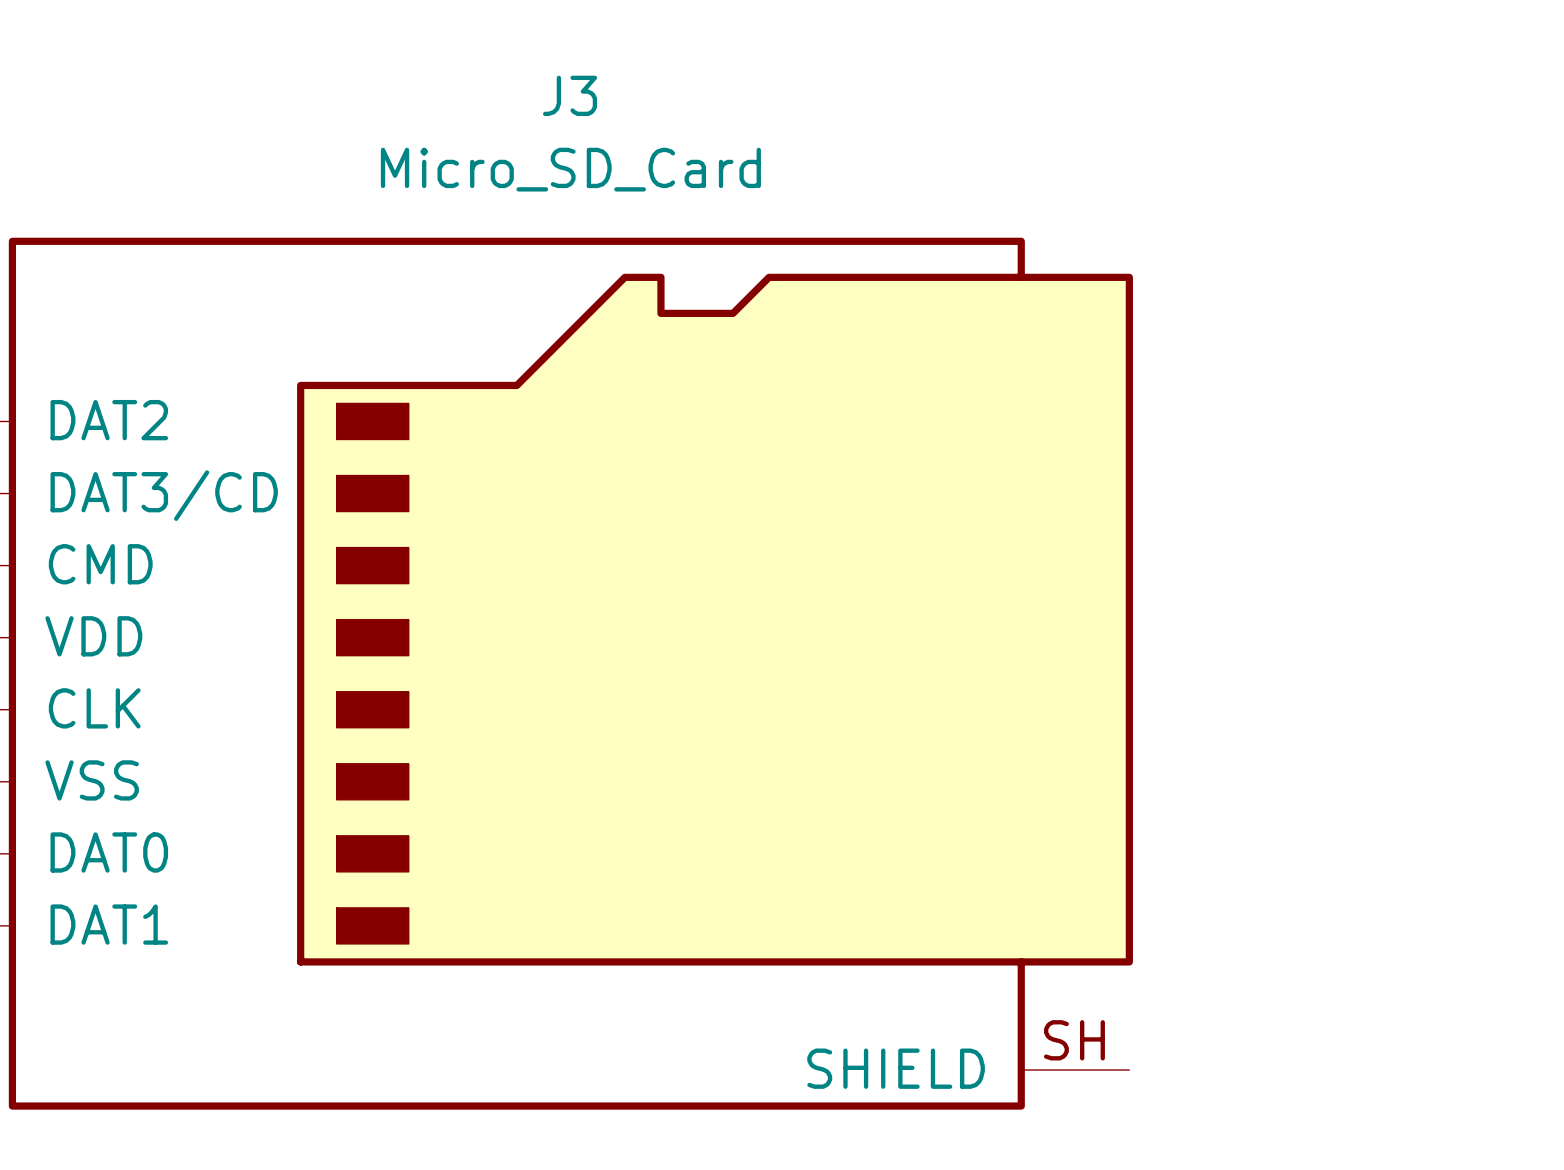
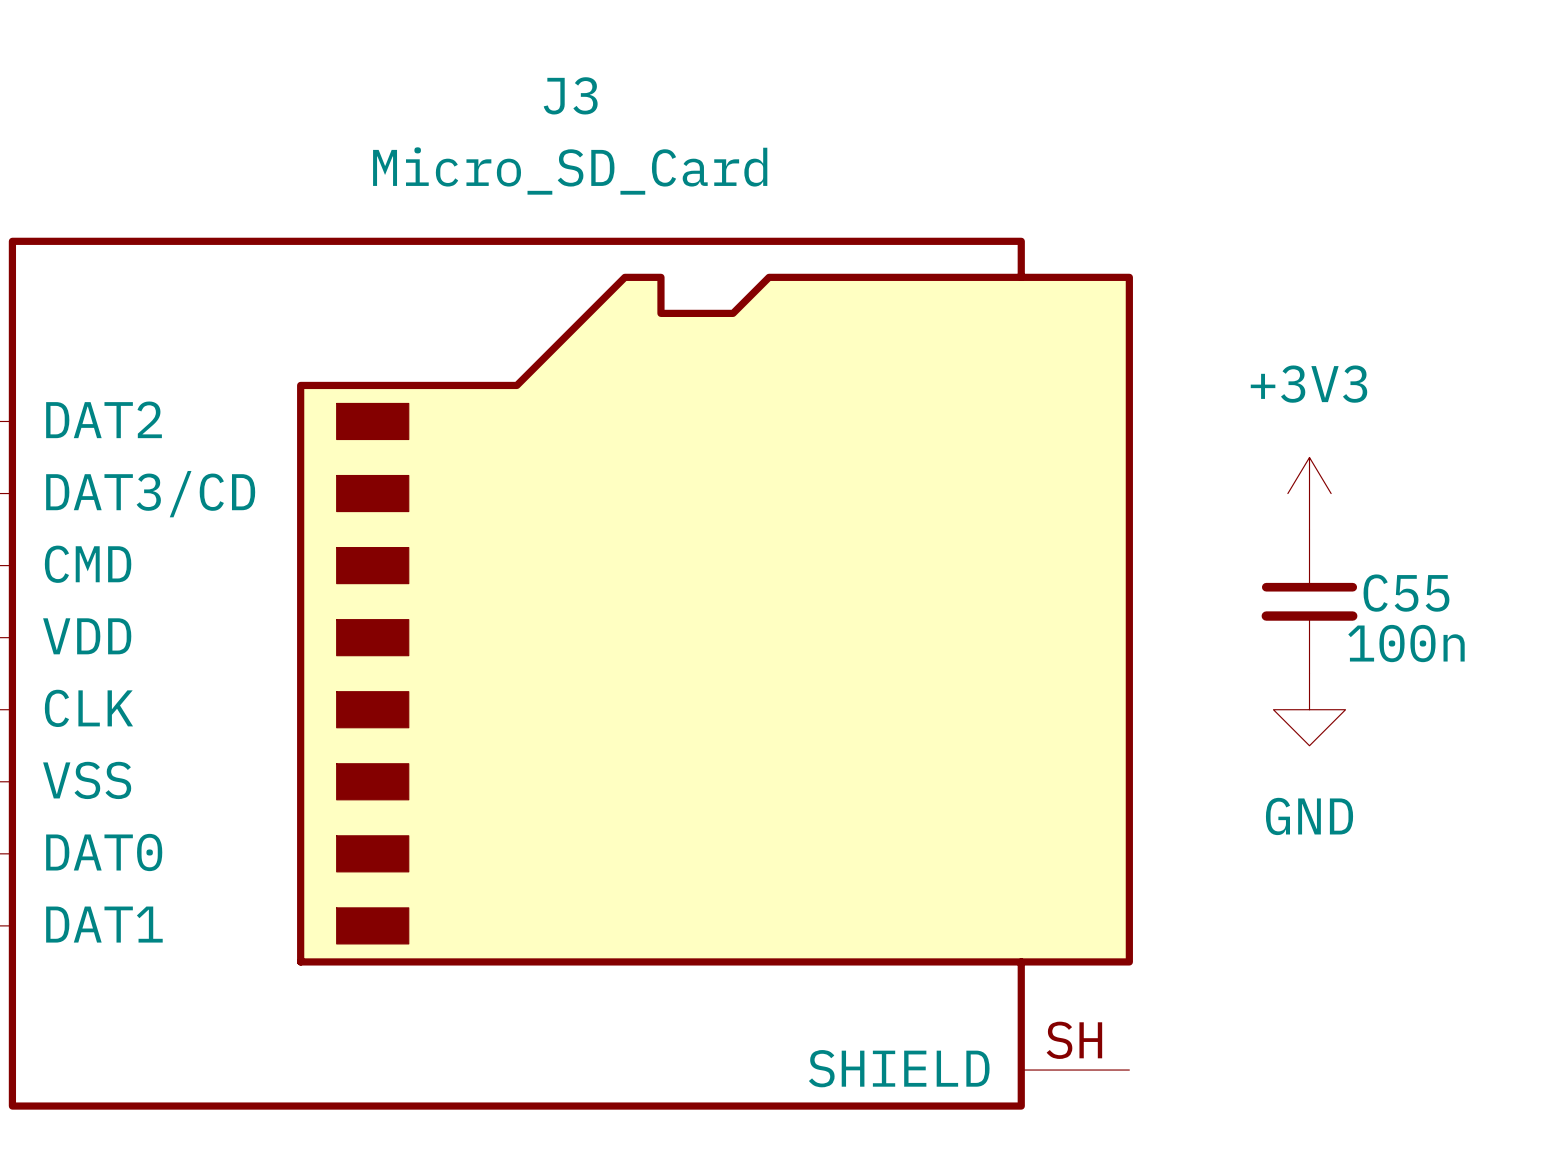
power symbol: none -> +3V3 (1309, 493)
C55: none -> 100n (1309, 601)
power symbol: none -> GND (1309, 709)

